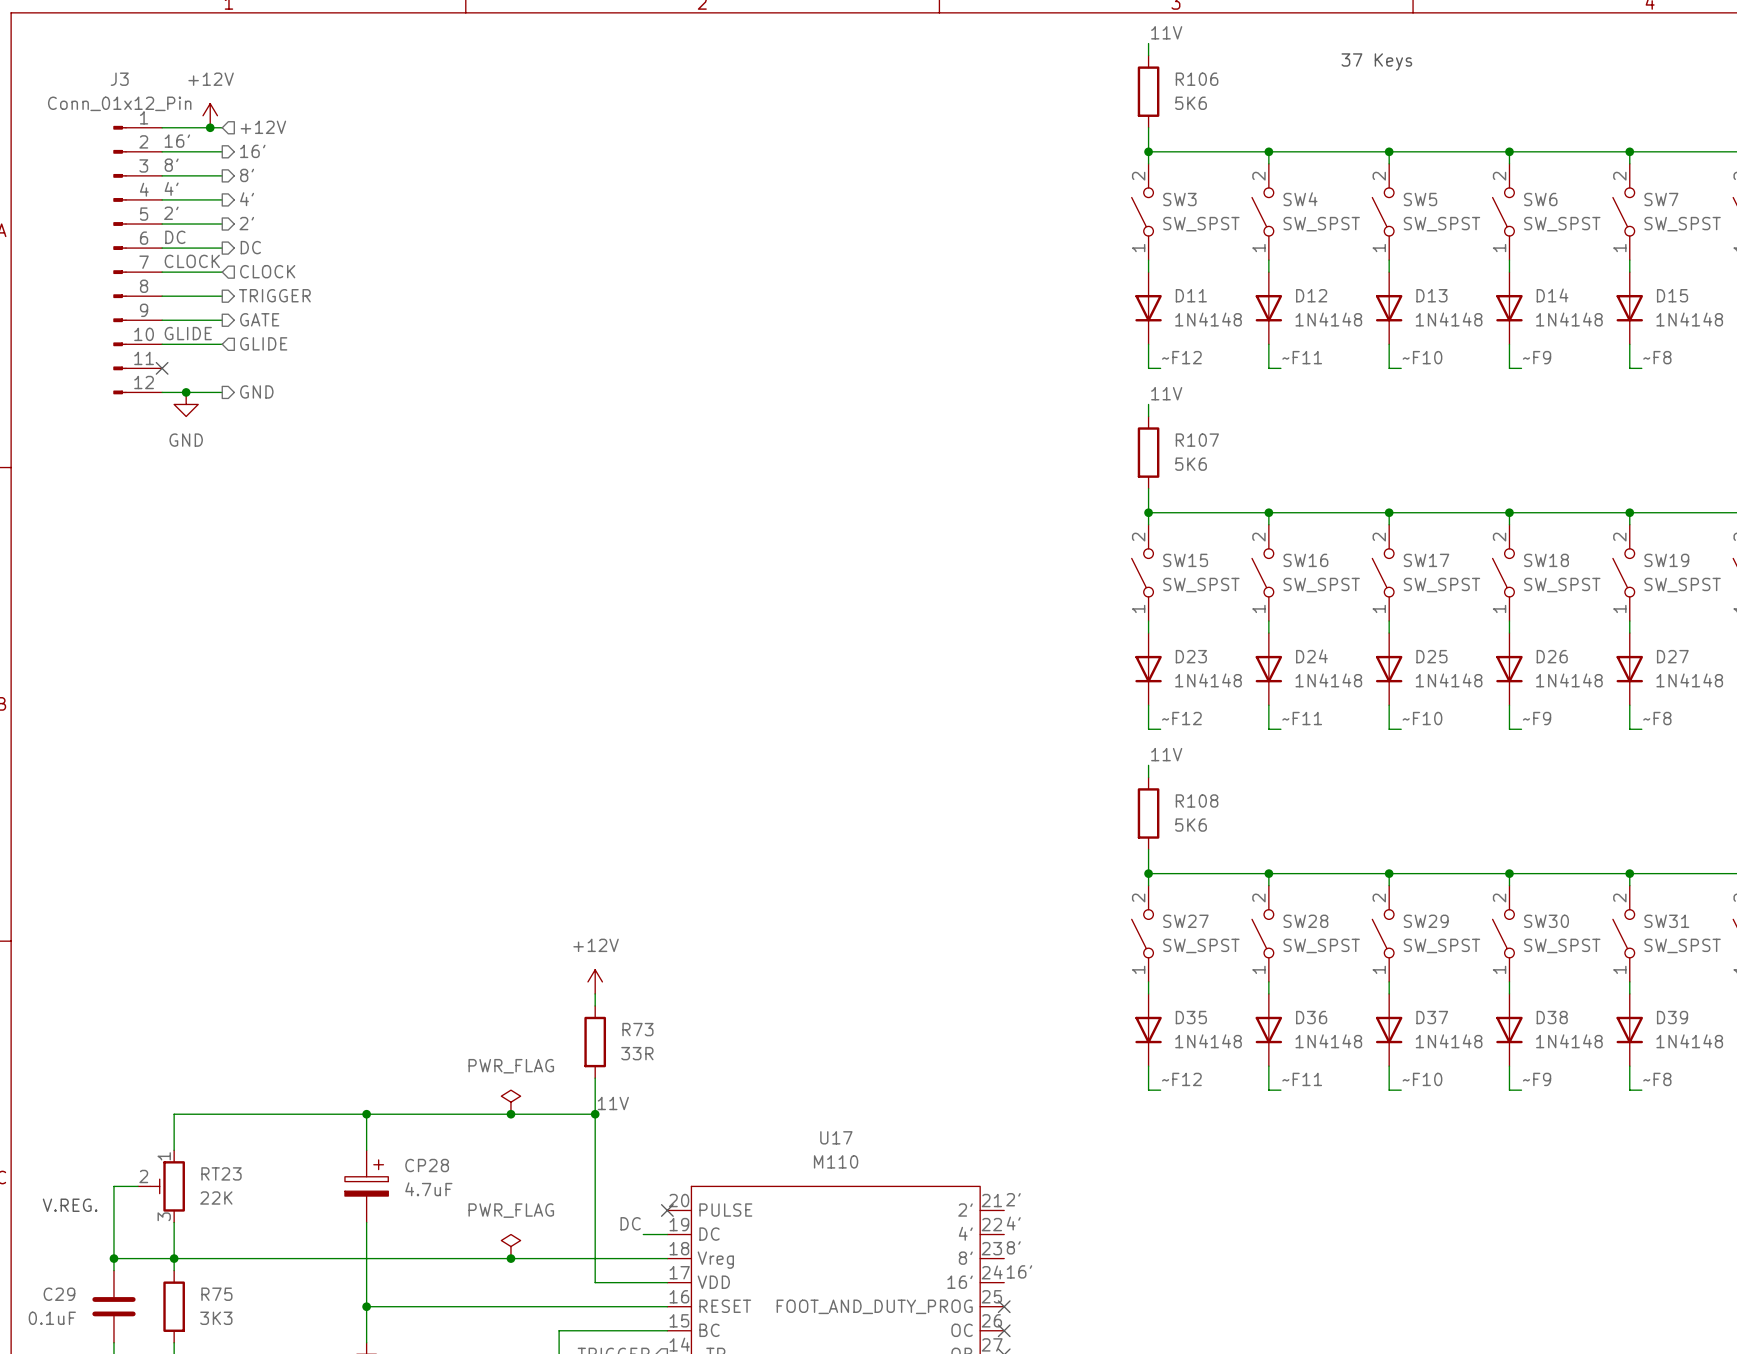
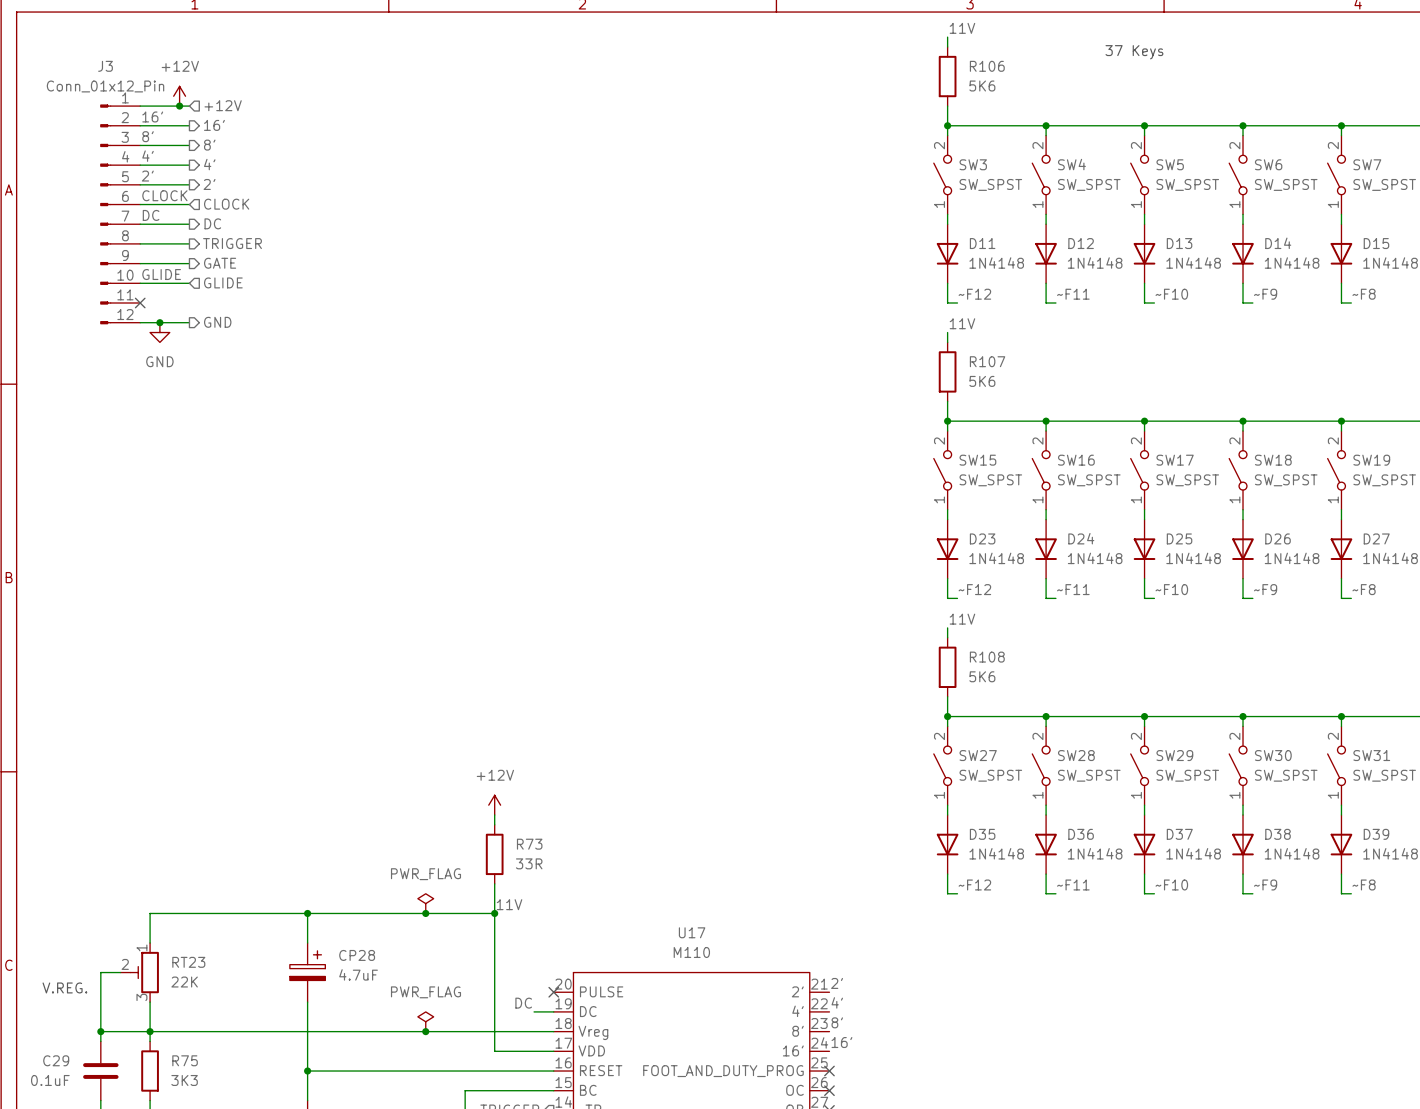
label: DC (175, 237) -> CLOCK (164, 195)
hierarchical label shape: output (250, 247) -> input (226, 204)
hierarchical label: DC (250, 247) -> CLOCK (226, 204)
label: CLOCK (192, 261) -> DC (151, 215)
hierarchical label shape: input (267, 271) -> output (212, 223)
hierarchical label: CLOCK (267, 271) -> DC (212, 223)

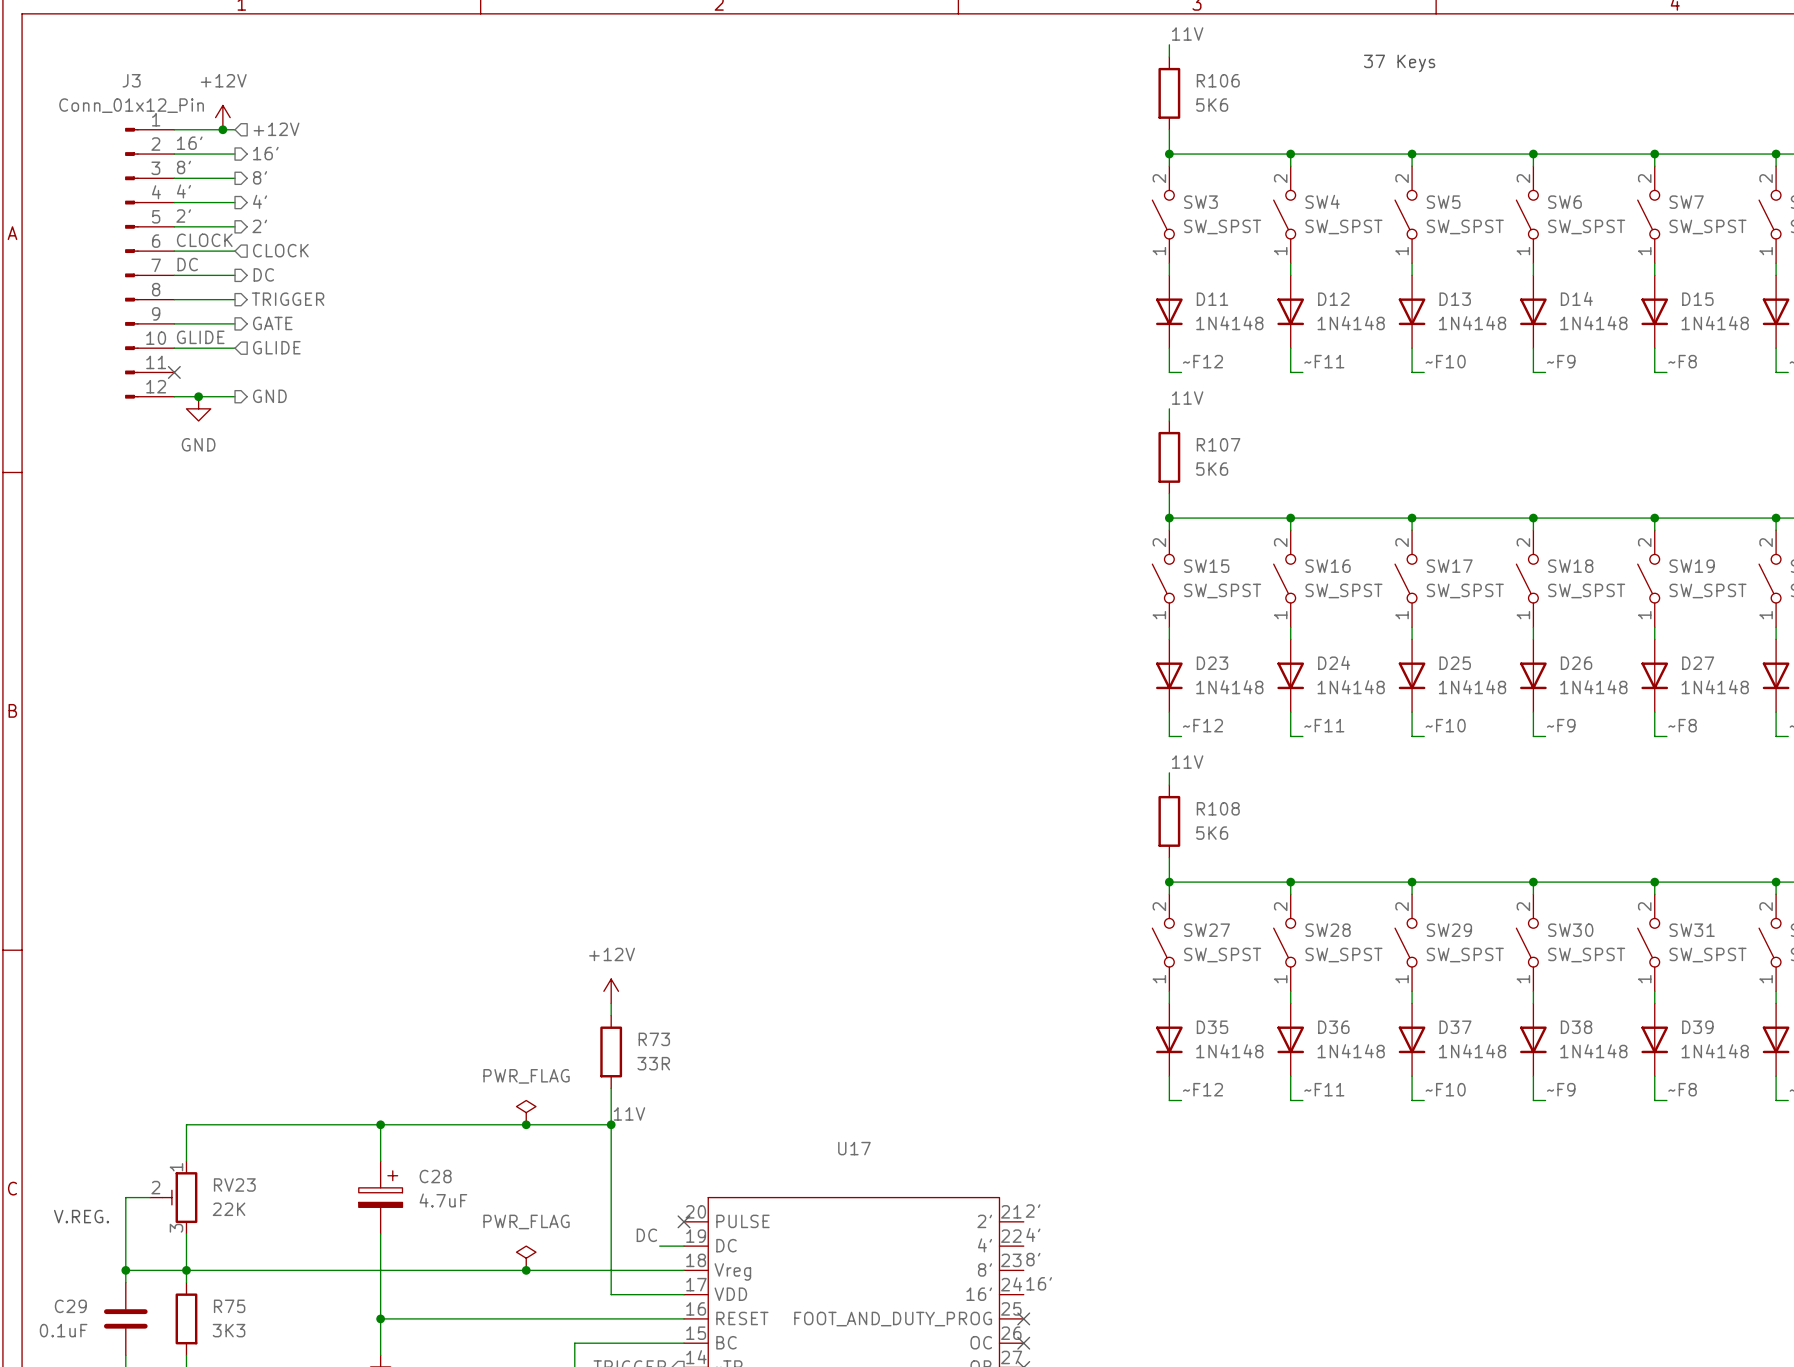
U17 value: M110 (691, 952) -> none
CP28 name: CP28 (357, 955) -> C28 (435, 1176)
RT23 name: RT23 (188, 962) -> RV23 (234, 1185)

